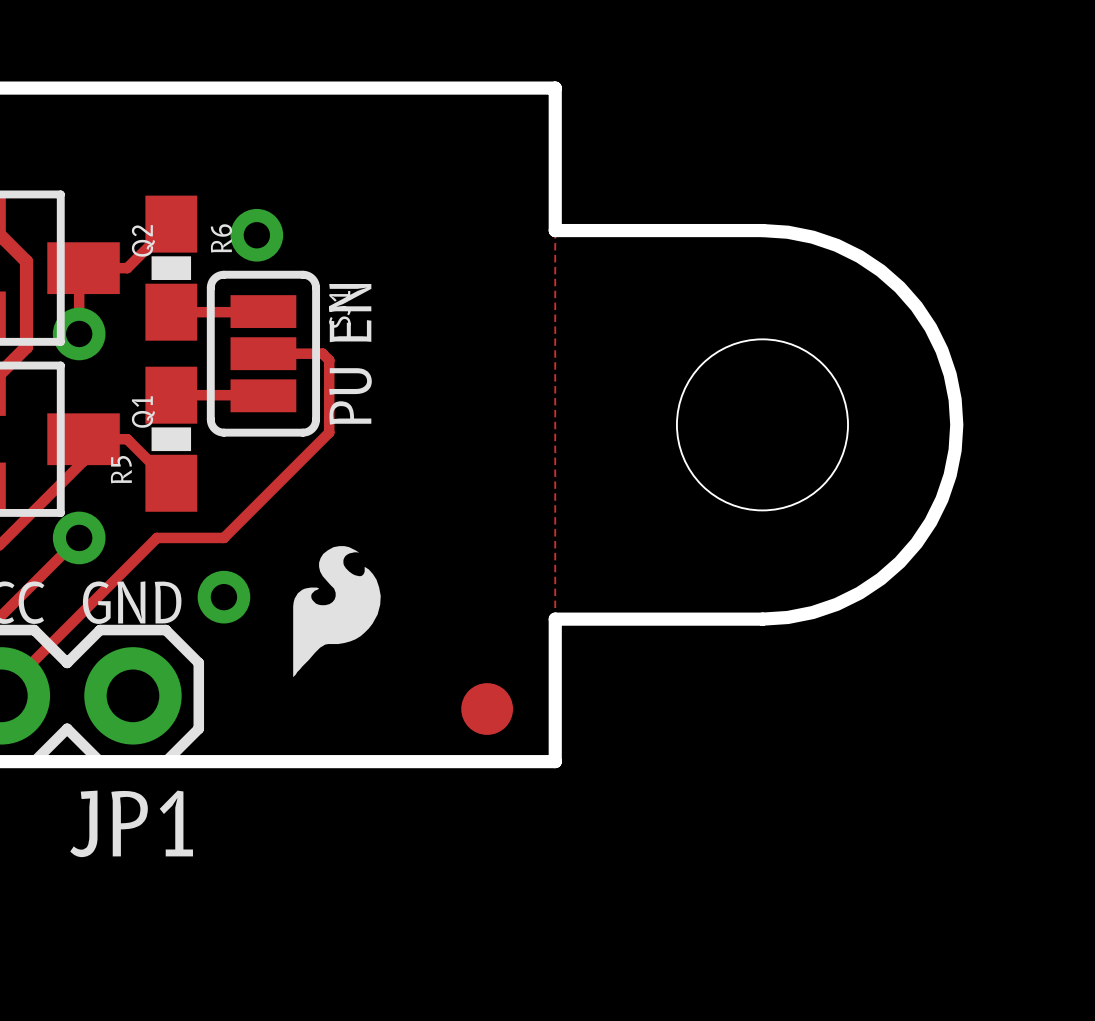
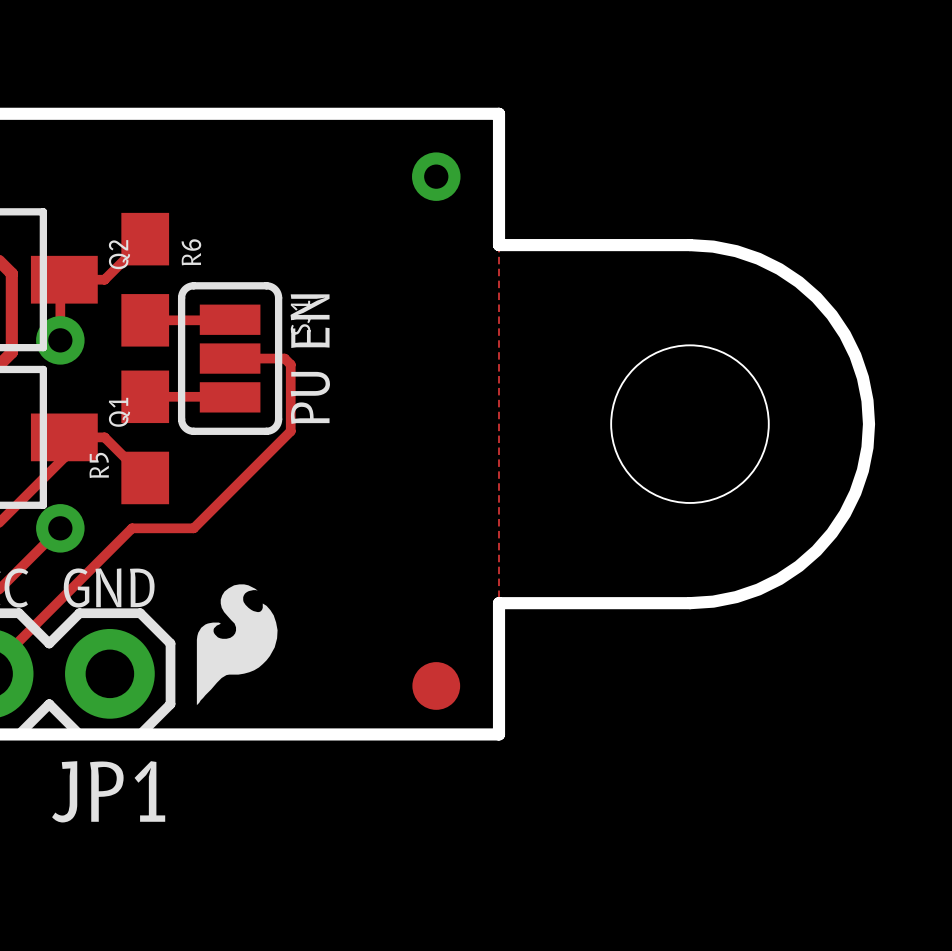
R6 footprint: [145, 195, 198, 341] -> [121, 212, 170, 347]
via position: (256, 235) -> (436, 176)
R5 footprint: [145, 366, 198, 512] -> [121, 370, 170, 505]
via: (223, 597) -> none
drawing position: (336, 611) -> (237, 645)

